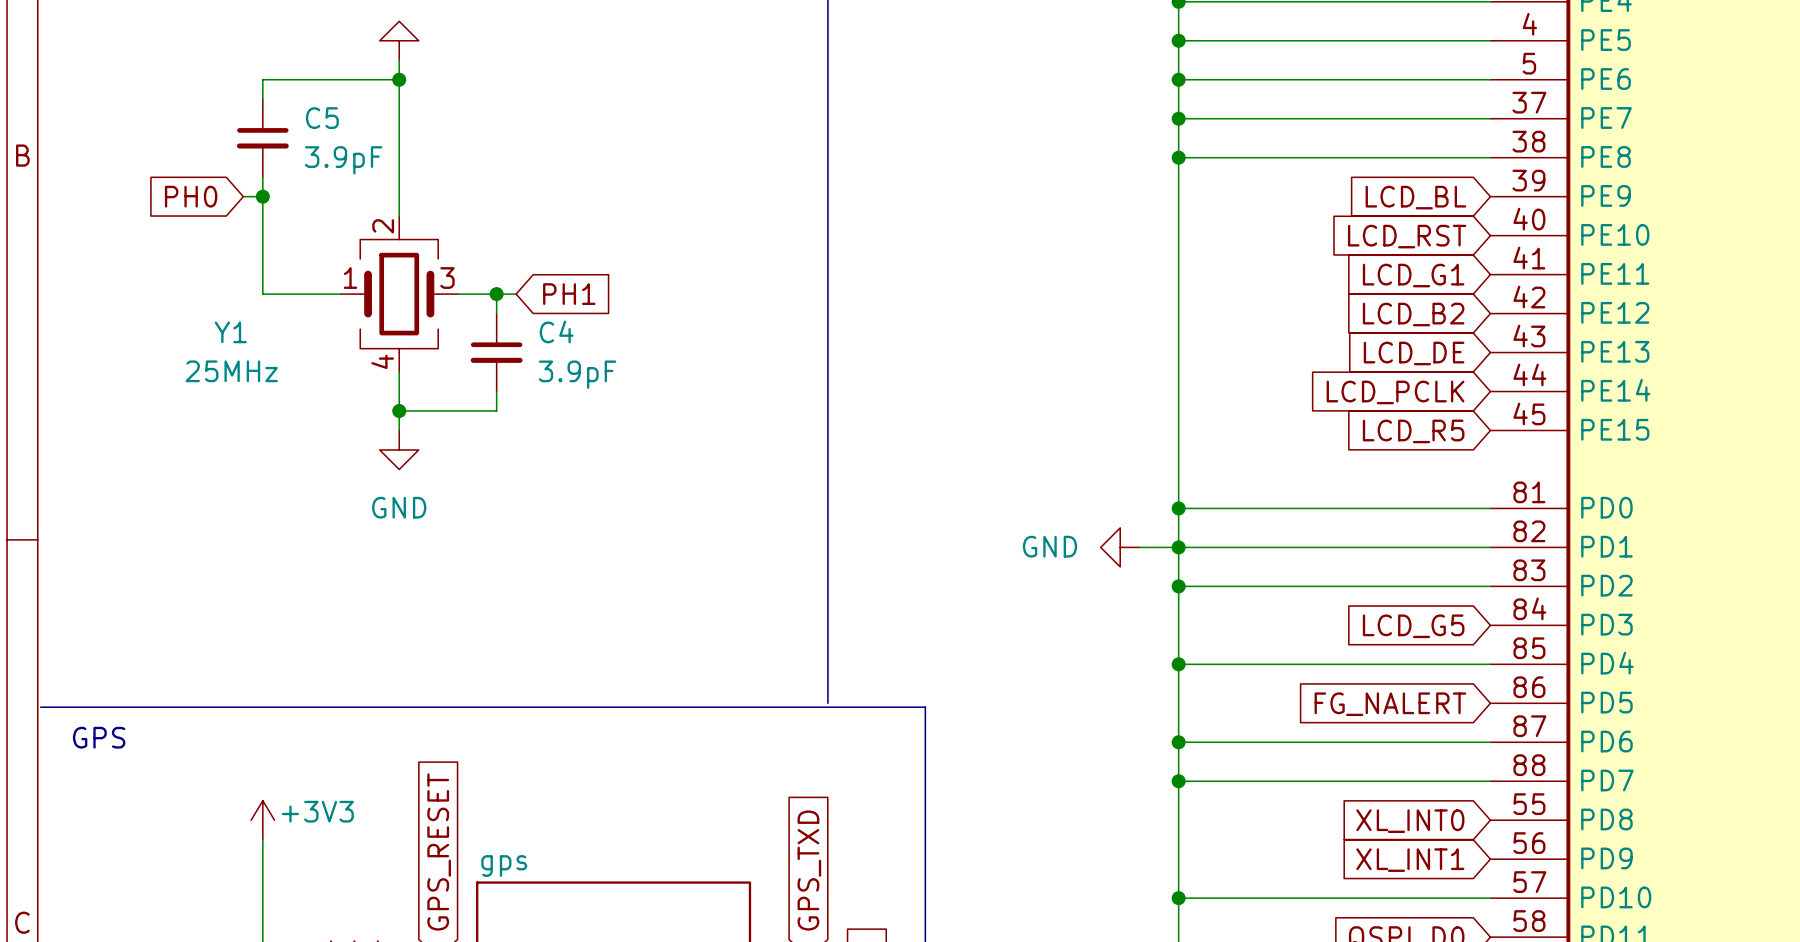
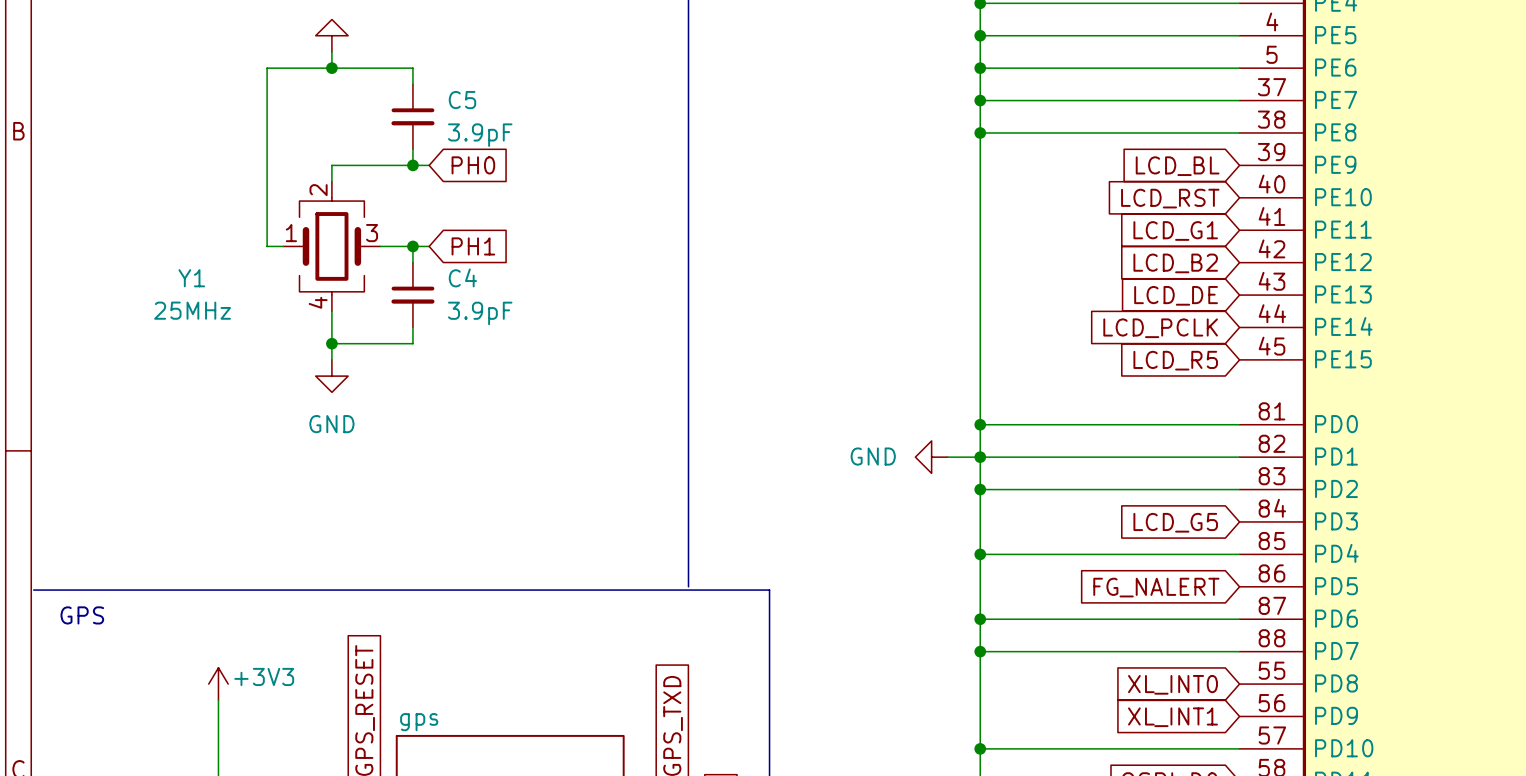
wire: (321, 79) (262, 79) (262, 99) -> none
wire: (399, 79) (399, 196) -> (331, 68) (412, 68) (412, 84)
C5 position: (262, 138) -> (412, 116)
wire: (262, 177) (262, 294) (321, 294) -> (267, 68) (267, 246)
wire: none -> (412, 149) (412, 165)
global label rotation: 0° (191, 196) -> 180° (473, 165)
global label position: PH0 (191, 196) -> PH0 (473, 165)
wire: (243, 196) (262, 196) -> none
junction: (262, 196) -> none
wire: none -> (331, 165) (429, 165)
junction: none -> (412, 165)

